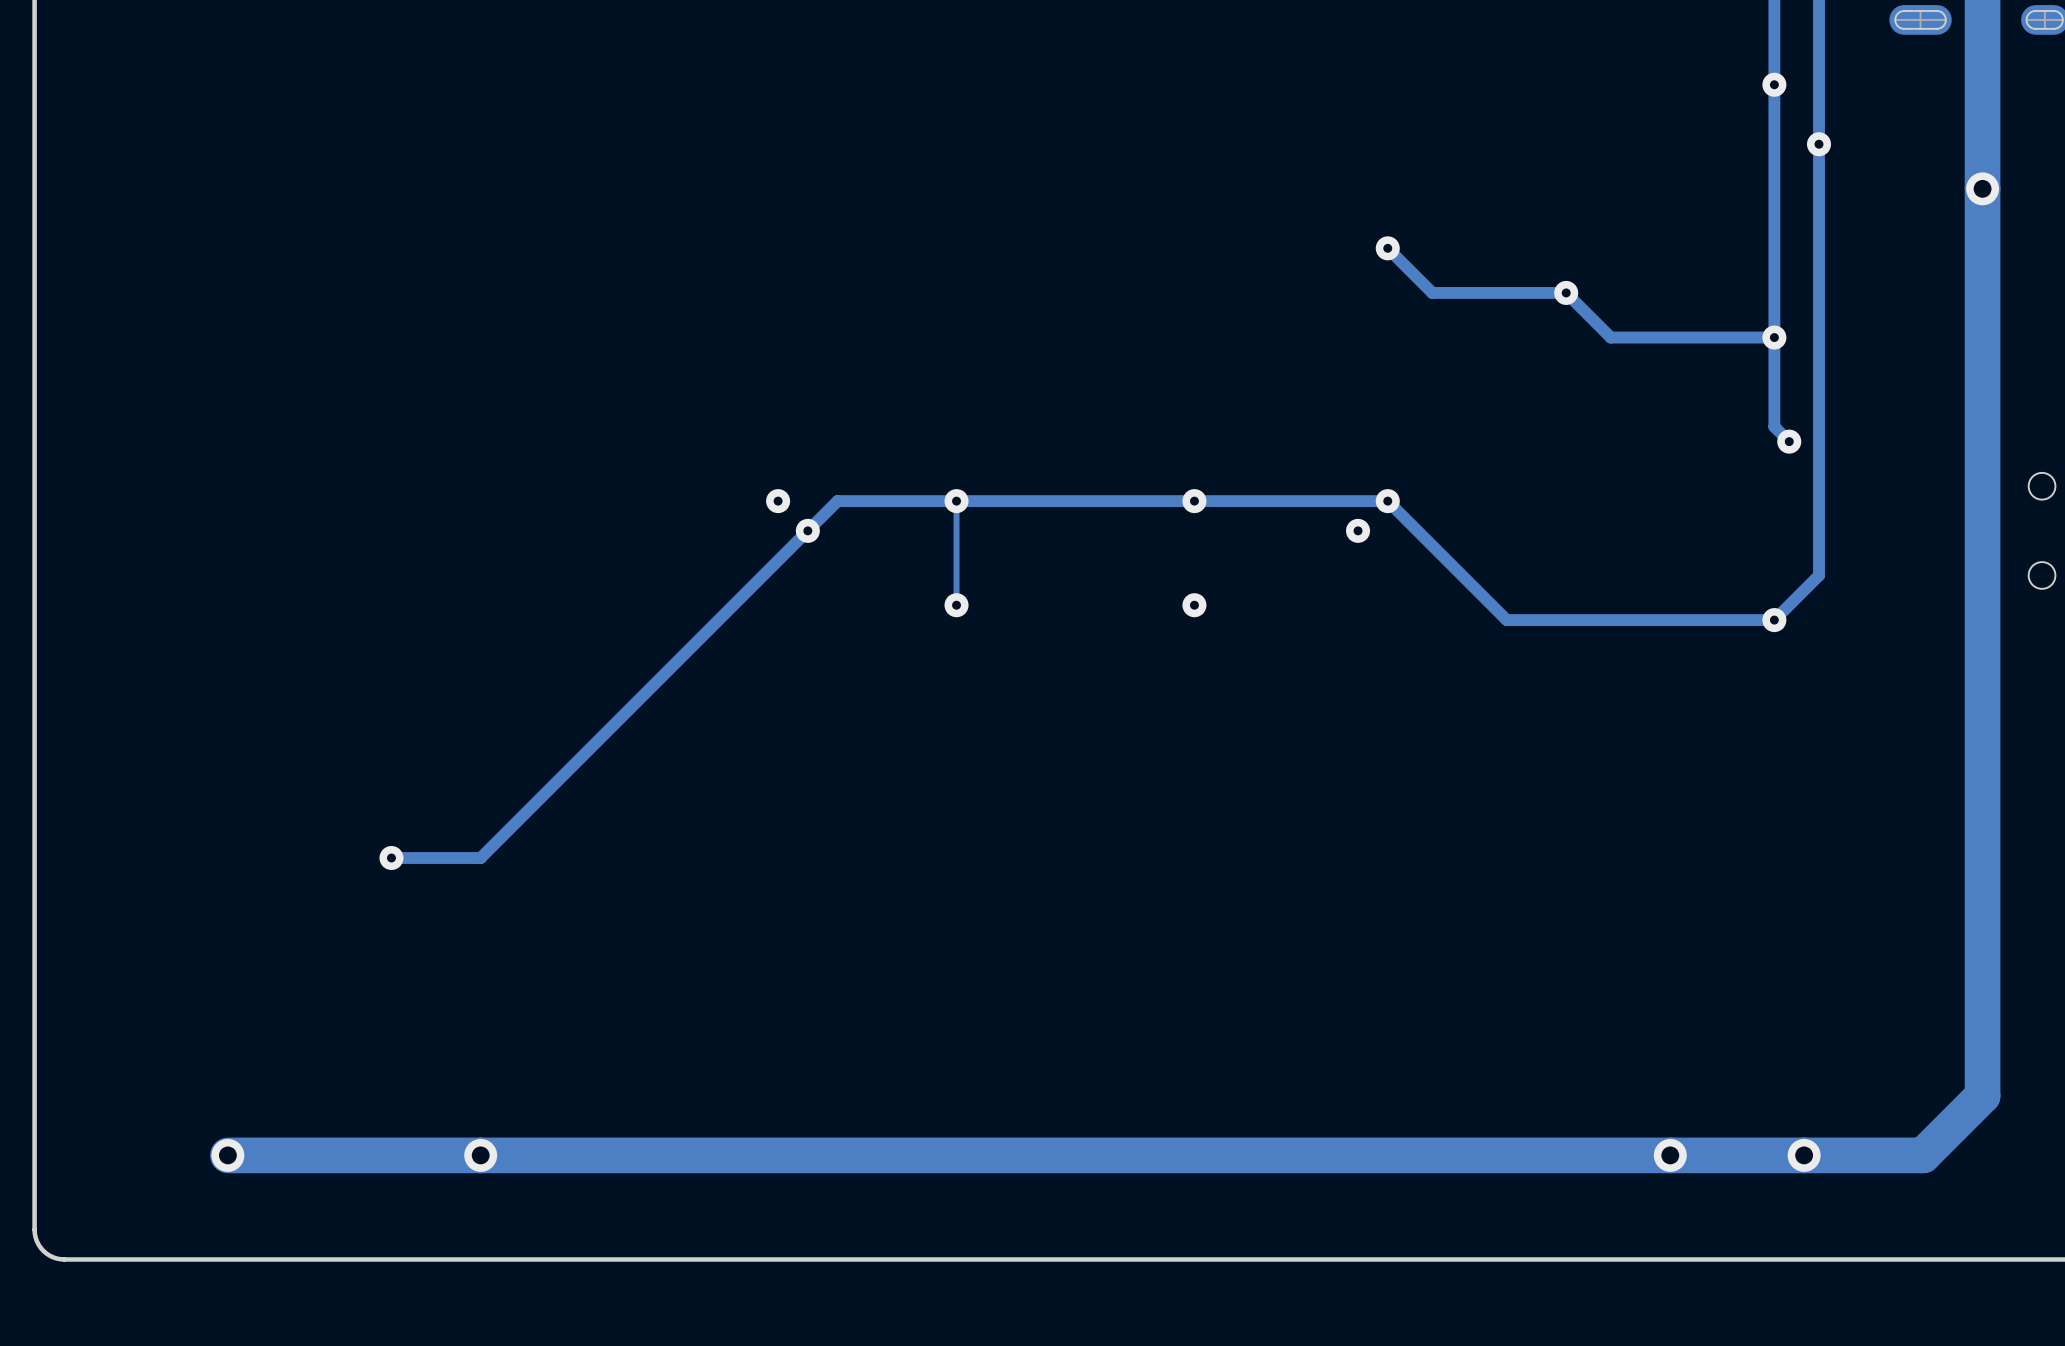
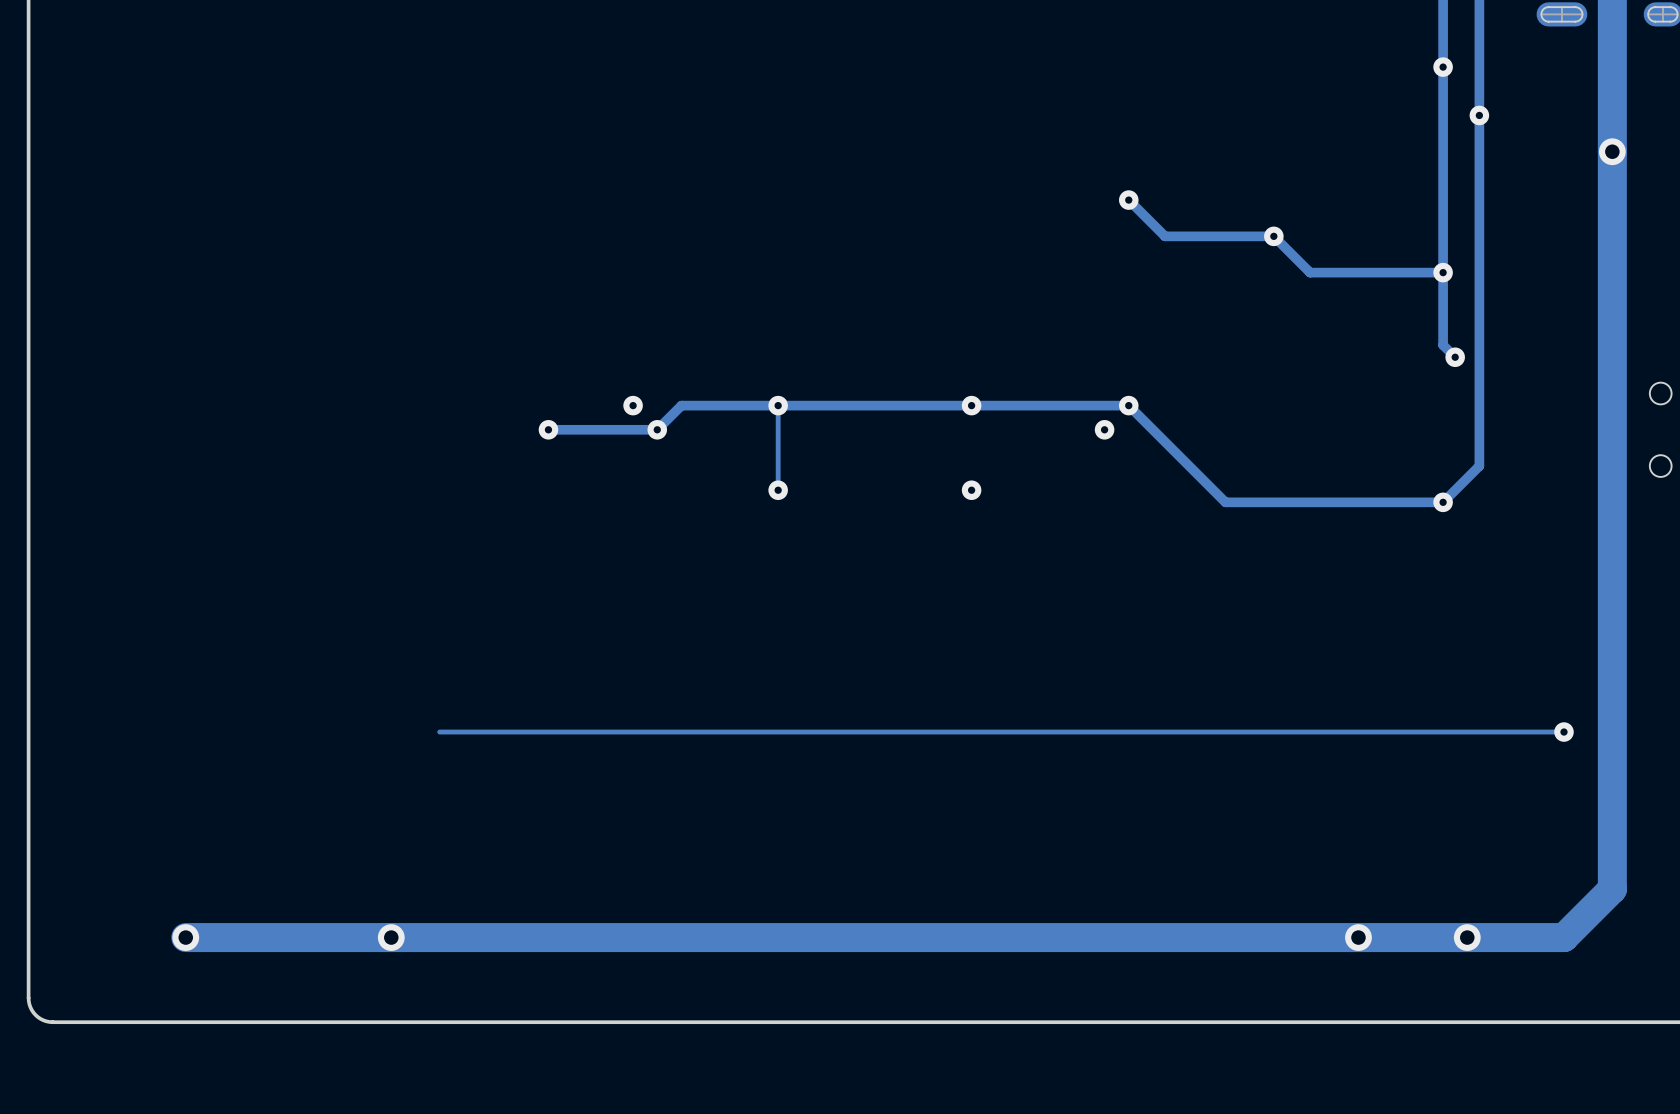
via: none -> (548, 429)
track: (807, 530) (480, 858) (391, 858) -> (657, 429) (548, 429)
via: (391, 858) -> none
track: none -> (1563, 732) (439, 732)
via: none -> (1563, 732)

